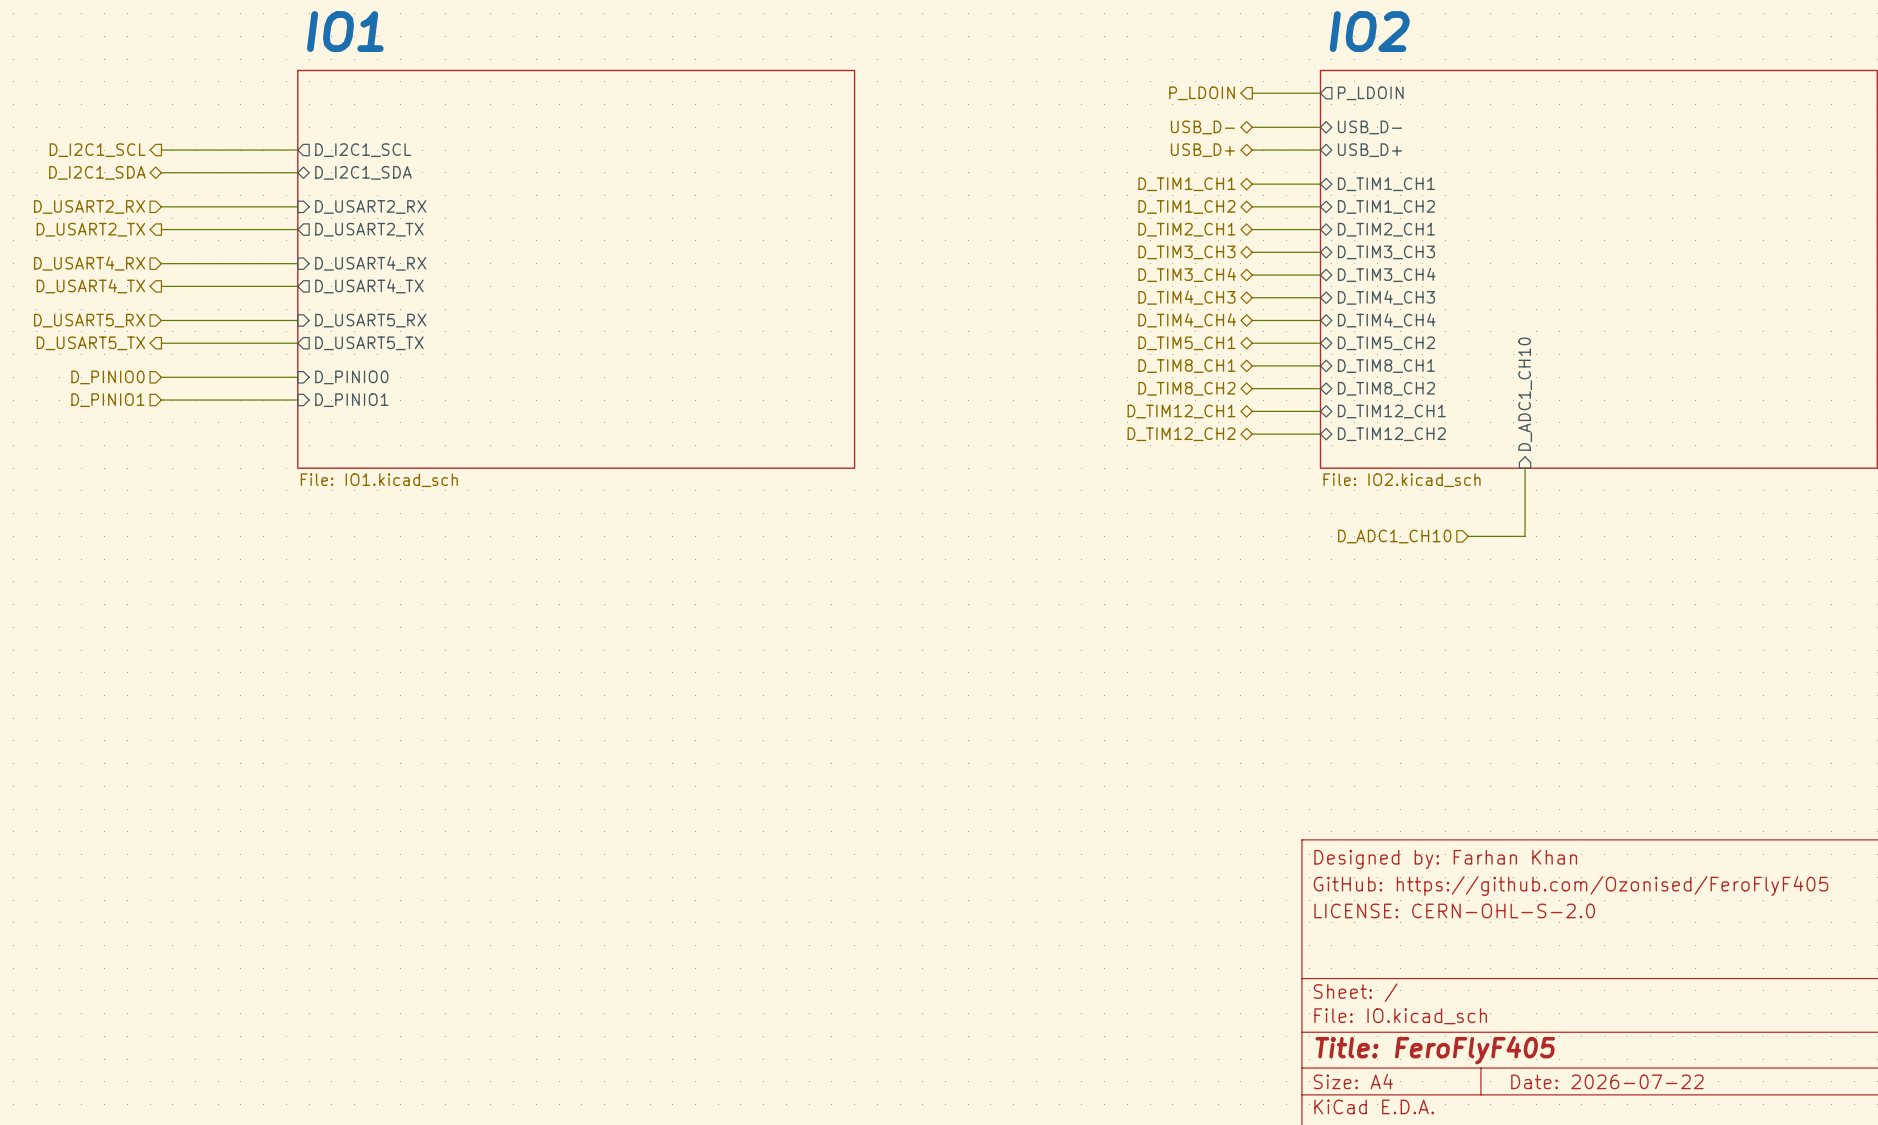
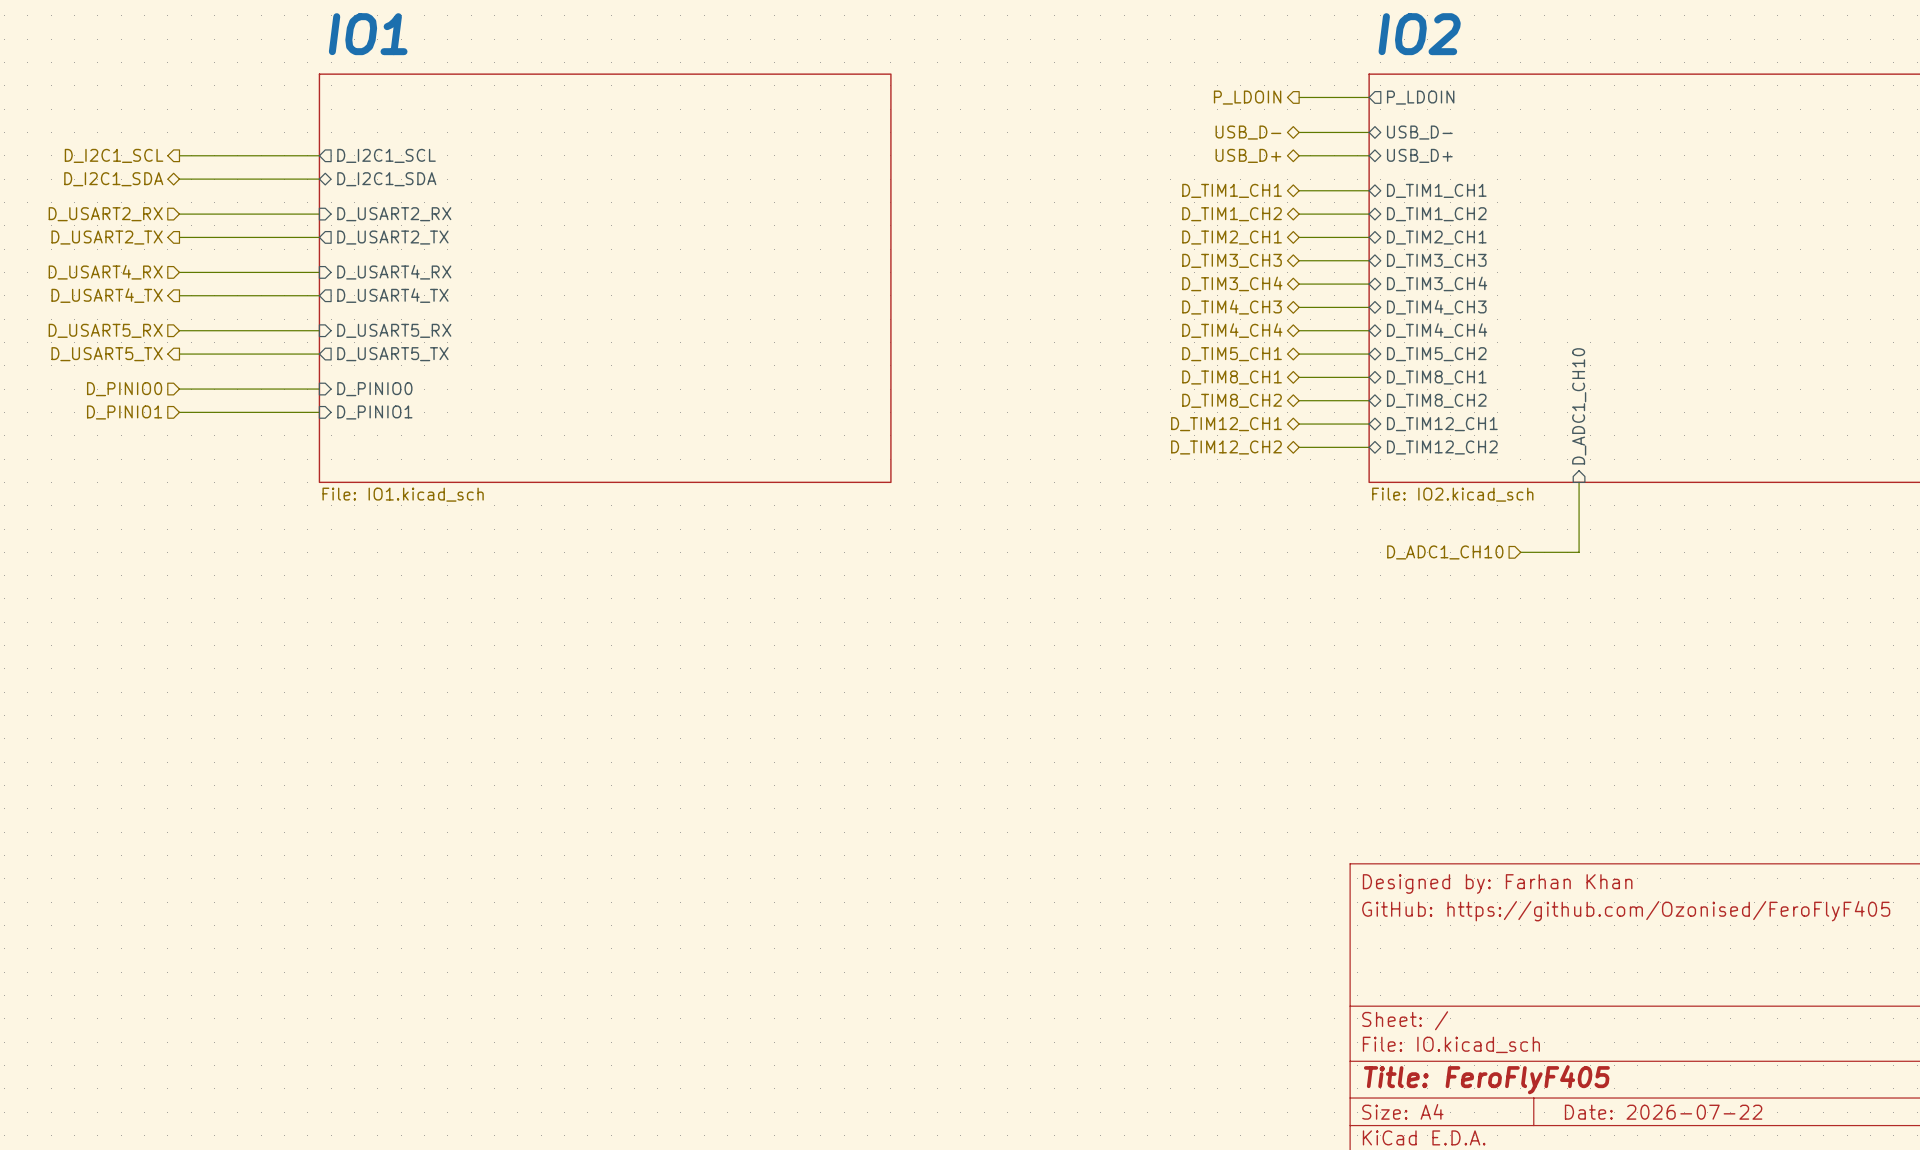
title block: LICENSE: CERN-OHL-S-2.0 (1454, 910) -> none

